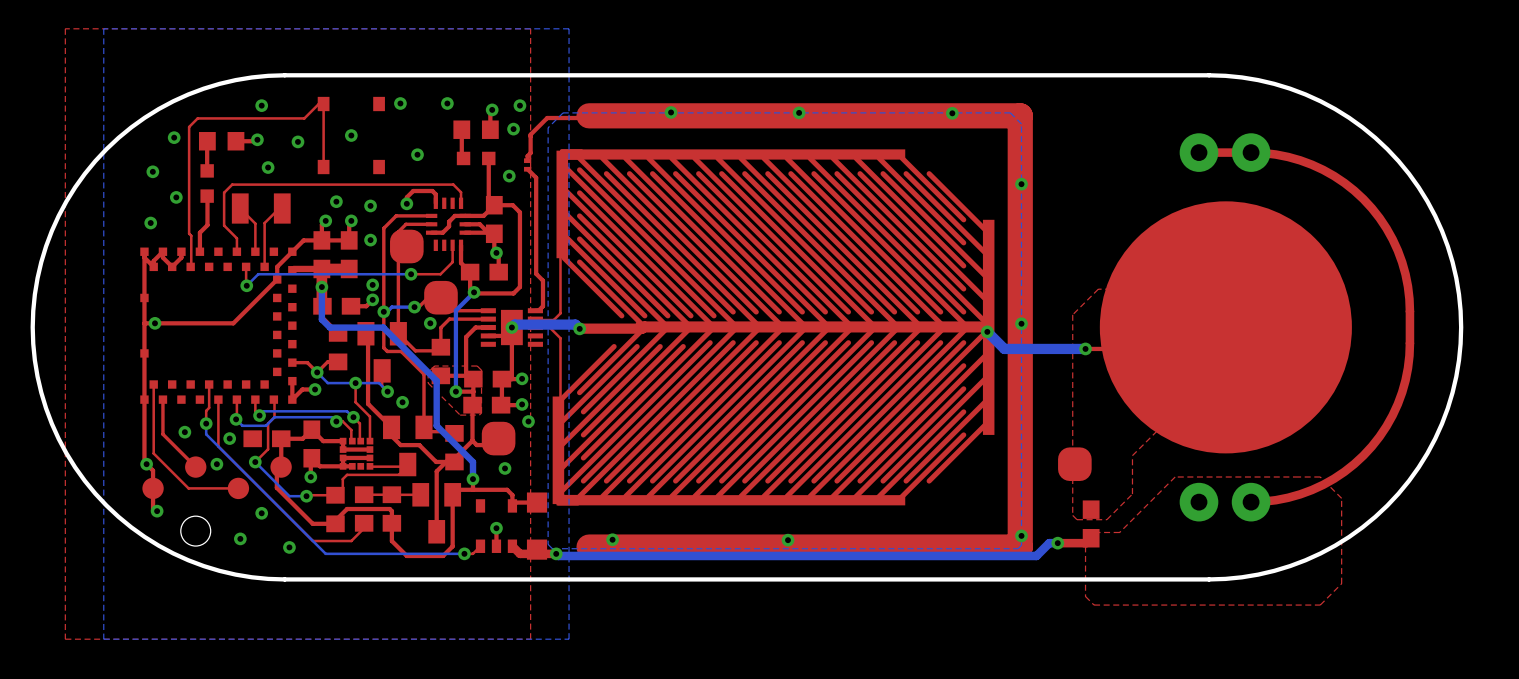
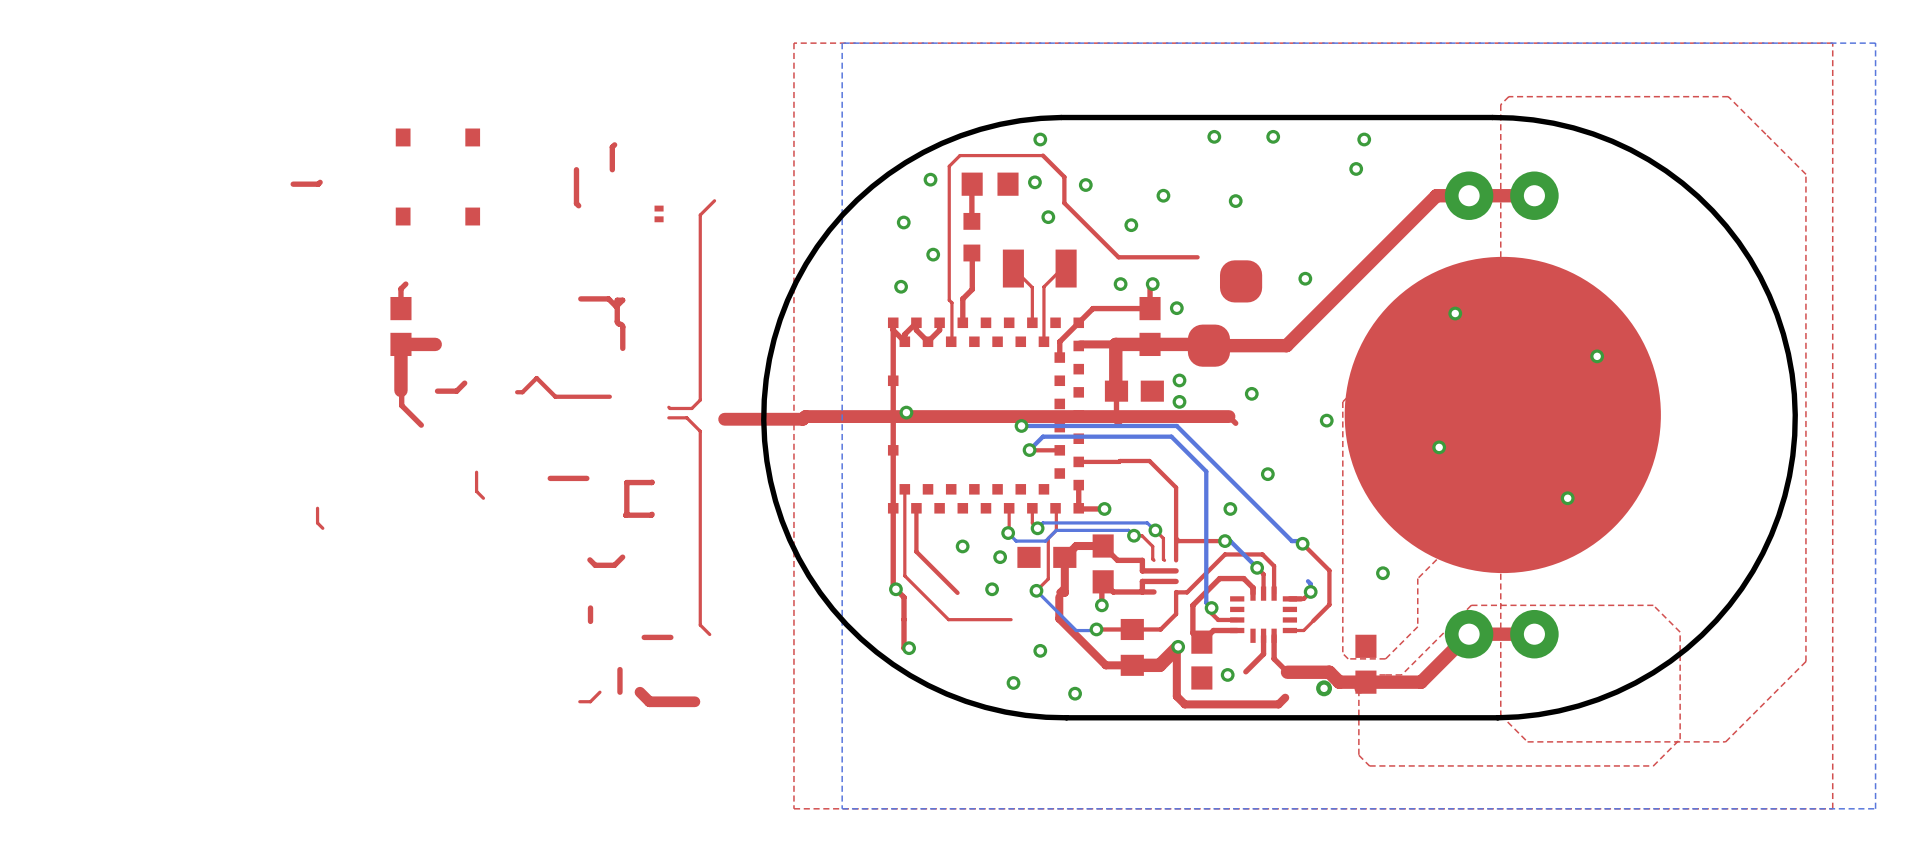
top zone outline: (530, 28) (65, 28) (65, 639) (530, 639) (530, 28) -> none
bottom zone outline: (569, 28) (103, 28) (103, 639) (569, 639) (569, 28) -> none
top zone outline: none -> (1832, 43) (793, 43) (793, 808) (1832, 808) (1832, 43)
bottom zone outline: none -> (1875, 43) (842, 43) (842, 808) (1875, 808) (1875, 43)
top zone outline: none -> (1728, 96) (1805, 174) (1805, 661) (1725, 741) (1527, 741) (1500, 715) (1500, 104) (1508, 96) (1728, 96)
board edge: (1209, 75) (284, 75) (251, 77) (219, 83) (173, 101) (131, 127) (95, 161) (66, 201) (46, 246) (34, 294) (33, 343) (41, 392) (51, 423) (66, 453) (95, 493) (118, 516) (158, 545) (188, 560) (219, 570) (251, 577) (284, 579) (1209, 579) (1241, 577) (1274, 570) (1305, 560) (1349, 536) (1387, 505) (1418, 467) (1441, 423) (1456, 376) (1460, 343) (1459, 294) (1447, 246) (1427, 201) (1398, 161) (1375, 137) (1335, 109) (1290, 88) (1241, 77) (1209, 75) -> (1492, 117) (1533, 119) (1573, 127) (1612, 141) (1666, 170) (1712, 210) (1738, 242) (1760, 277) (1783, 334) (1792, 374) (1794, 435) (1789, 476) (1778, 515) (1762, 553) (1741, 588) (1701, 635) (1670, 661) (1635, 682) (1598, 699) (1558, 710) (1518, 716) (1046, 717) (985, 707) (946, 694) (910, 675) (860, 638) (820, 592) (798, 558) (775, 501) (764, 440) (766, 379) (780, 319) (806, 263) (842, 214) (888, 173) (923, 152) (960, 135) (1000, 124) (1040, 118) (1492, 117)
via: (400, 103) -> none
via: (447, 103) -> none
via: none -> (1214, 136)
via: none -> (1273, 136)
top track: (321, 104) (323, 106) (323, 167) -> none
top track: (323, 104) (318, 104) (304, 118) (197, 118) (189, 126) (190, 266) -> none
via: (261, 105) -> none
via: (519, 105) -> none
via: none -> (1040, 139)
via: none -> (1364, 139)
via: (492, 109) -> none
via: (671, 112) -> none
via: (799, 112) -> none
bottom zone outline: (1010, 112) (1021, 123) (1021, 545) (1018, 548) (552, 548) (548, 544) (548, 127) (563, 112) (1010, 112) -> none
via: (952, 113) -> none
top track: (612, 118) (547, 118) (530, 134) (530, 153) (527, 156) (527, 160) -> none
part: (476, 129) -> none
via: (513, 129) -> none
via: none -> (1356, 168)
via: (351, 135) -> none
via: (174, 137) -> none
via: none -> (930, 179)
via: (257, 139) -> none
via: none -> (1034, 182)
top track: (207, 141) (207, 170) -> none
part: (221, 141) -> none
via: (297, 141) -> none
top track: none -> (971, 184) (971, 221)
part: none -> (990, 184)
via: none -> (1085, 185)
via: none -> (1163, 195)
top track: none -> (1534, 195) (1436, 195) (1286, 345) (1115, 344)
top track: (1198, 152) (1275, 154) (1300, 160) (1334, 176) (1354, 190) (1379, 218) (1397, 250) (1407, 286) (1409, 311) (1407, 368) (1397, 404) (1379, 436) (1354, 464) (1323, 484) (1288, 497) (1251, 502) -> none
via: (417, 154) -> none
via: none -> (1235, 201)
part: (476, 158) -> none
top track: (488, 158) (488, 197) (496, 205) -> none
via: (268, 167) -> none
via: none -> (1048, 217)
top track: (527, 169) (536, 177) (536, 273) (542, 280) (542, 306) (538, 310) (535, 310) -> none
via: (152, 171) -> none
via: none -> (903, 222)
via: none -> (1131, 225)
via: (509, 176) -> none
part: (207, 183) -> none
part: none -> (971, 237)
via: (1021, 184) -> none
top track: (207, 196) (207, 225) (199, 232) (199, 251) -> none
top track: none -> (971, 253) (972, 289) (962, 298) (962, 322)
via: (176, 197) -> none
via: none -> (933, 254)
top track: none -> (1197, 257) (1118, 257) (1064, 203) (1064, 176) (1042, 155) (959, 155) (949, 166) (951, 341)
via: (336, 201) -> none
via: (406, 203) -> none
top track: (435, 203) (435, 194) (432, 191) (413, 191) (406, 197) (406, 203) -> none
top track: (461, 203) (461, 192) (453, 184) (232, 184) (224, 192) (224, 225) (236, 238) (236, 251) -> none
via: (370, 205) -> none
top track: (240, 208) (255, 223) (255, 251) -> none
part: (261, 208) -> none
top track: (282, 208) (279, 208) (264, 223) (264, 266) -> none
top track: none -> (1013, 268) (1032, 287) (1032, 322)
part: none -> (1039, 268)
top track: none -> (1066, 268) (1062, 268) (1043, 286) (1043, 341)
top track: (431, 215) (396, 215) (383, 228) (383, 347) (387, 351) (401, 351) (423, 374) (423, 427) (428, 431) (452, 431) (454, 433) -> none
via: none -> (1305, 278)
part: none -> (1241, 281)
part: (494, 219) -> none
via: (325, 220) -> none
top track: (351, 220) (349, 223) (349, 240) (303, 240) (277, 266) (277, 279) (233, 323) (144, 323) -> none
via: (351, 220) -> none
via: none -> (1120, 284)
top track: none -> (1152, 284) (1150, 286) (1150, 308) (1092, 308) (1059, 341) (1059, 357)
via: none -> (1152, 284)
via: (150, 223) -> none
via: none -> (901, 286)
top track: (431, 224) (406, 224) (398, 231) (398, 333) (415, 350) (437, 350) (440, 347) (440, 327) (449, 319) (488, 319) -> none
part: (448, 224) -> none
top track: (465, 224) (479, 224) (493, 238) -> none
top track: (431, 232) (442, 232) (454, 215) (483, 215) (494, 205) (512, 205) (519, 212) (519, 287) (513, 293) (475, 293) (470, 288) (470, 272) (461, 263) (461, 245) -> none
via: (370, 240) -> none
via: none -> (1176, 308)
via: none -> (1455, 313)
top track: (452, 245) (452, 262) (440, 274) (411, 274) -> none
part: (406, 246) -> none
top track: (144, 251) (144, 462) (153, 470) (153, 511) (157, 511) -> none
top track: (181, 251) (181, 257) (172, 266) (162, 257) (162, 251) (153, 260) (153, 266) (144, 257) -> none
top track: none -> (893, 322) (893, 586) (904, 597) (904, 648) (909, 648)
top track: none -> (939, 322) (939, 330) (928, 341) (916, 330) (916, 322) (904, 334) (904, 341) (893, 330)
via: (496, 252) -> none
part: (349, 254) -> none
part: none -> (1150, 326)
top track: (246, 266) (246, 285) -> none
top track: (321, 268) (292, 270) -> none
top track: none -> (1115, 344) (1116, 421) (1120, 425)
top track: none -> (1115, 344) (1078, 345)
part: none -> (1208, 345)
part: (484, 272) -> none
bottom track: (411, 274) (258, 274) (246, 285) -> none
via: (411, 274) -> none
via: none -> (1597, 356)
via: (372, 284) -> none
via: (246, 285) -> none
bottom track: (321, 287) (321, 319) (329, 327) (383, 327) (436, 380) (436, 425) (472, 462) (472, 479) -> none
via: (321, 287) -> none
bottom track: (474, 292) (455, 310) (455, 391) -> none
via: (474, 292) -> none
part: (440, 297) -> none
via: none -> (1179, 380)
via: (372, 299) -> none
part: (336, 306) -> none
part: none -> (1134, 391)
bottom track: (414, 307) (391, 307) (383, 311) -> none
via: (414, 307) -> none
via: none -> (1251, 393)
via: (383, 311) -> none
via: none -> (1179, 401)
via: (154, 323) -> none
via: (430, 323) -> none
via: none -> (906, 412)
via: (1021, 323) -> none
part: (218, 325) -> none
part: none -> (985, 415)
top track: (488, 327) (475, 327) (466, 337) (466, 371) (473, 379) (472, 440) (453, 459) (448, 459) (436, 471) (436, 531) -> none
bottom track: (511, 327) (514, 324) (575, 324) (579, 328) -> none
part: (511, 327) -> none
via: (511, 327) -> none
part: (773, 327) -> none
part position: (1225, 327) -> (1502, 414)
via: (579, 328) -> none
via: none -> (1326, 420)
part: (804, 331) -> none
bottom track: (987, 331) (1004, 348) (1085, 348) -> none
via: (987, 331) -> none
top track: (365, 333) (368, 335) (368, 403) (391, 427) (391, 435) (400, 445) (419, 445) (436, 461) (454, 461) (452, 459) -> none
bottom track: none -> (1021, 425) (1176, 425) (1291, 541) (1299, 541) (1302, 543)
via: none -> (1021, 425)
top track: (488, 335) (503, 335) (511, 327) (511, 379) -> none
part: (338, 347) -> none
via: (1085, 348) -> none
via: none -> (1439, 447)
part: (382, 352) -> none
bottom track: none -> (1029, 450) (1042, 436) (1171, 436) (1206, 471) (1206, 602) (1211, 608)
via: none -> (1029, 450)
top track: none -> (1059, 450) (1029, 450)
top track: (338, 361) (327, 361) (317, 372) (307, 362) (292, 362) -> none
part: (440, 361) -> none
top track: none -> (1078, 461) (1149, 460) (1176, 487) (1176, 560)
top zone outline: (477, 366) (481, 370) (481, 412) (479, 415) (460, 415) (428, 383) (428, 372) (434, 366) (477, 366) -> none
bottom track: (317, 372) (327, 383) (379, 383) (387, 391) -> none
via: (317, 372) -> none
via: none -> (1267, 474)
via: (522, 378) -> none
part: (487, 379) -> none
top track: (292, 381) (292, 399) (302, 389) (315, 389) -> none
top track: none -> (1078, 485) (1079, 508) (1104, 508)
top track: (355, 383) (355, 402) (369, 416) (369, 441) -> none
via: (355, 383) -> none
top track: (153, 384) (153, 453) (188, 488) (238, 488) -> none
top track: (209, 384) (209, 407) (206, 410) (206, 423) -> none
top track: none -> (904, 489) (904, 575) (948, 619) (1011, 619)
via: (315, 389) -> none
via: (387, 391) -> none
via: (455, 391) -> none
top track: (473, 391) (455, 391) -> none
via: none -> (1567, 498)
top track: (162, 399) (162, 434) (195, 467) -> none
top track: (218, 399) (218, 446) (312, 541) (351, 541) (364, 528) (364, 523) -> none
top track: (236, 399) (236, 419) -> none
top track: (273, 399) (274, 417) (268, 423) (268, 449) (255, 462) -> none
top track: none -> (916, 508) (916, 551) (957, 592)
top track: none -> (1009, 508) (1008, 533)
top track: none -> (1032, 508) (1032, 523) (1037, 528)
top track: none -> (1055, 508) (1056, 530) (1048, 538) (1048, 578) (1036, 590)
via: none -> (1104, 508)
via: none -> (1230, 508)
via: (402, 402) -> none
via: (522, 404) -> none
part: (486, 405) -> none
bottom track: (259, 415) (263, 411) (347, 411) (353, 417) -> none
via: (259, 415) -> none
bottom track: none -> (1037, 528) (1042, 522) (1147, 522) (1155, 530)
via: none -> (1037, 528)
top track: (353, 417) (359, 423) (360, 441) -> none
via: (353, 417) -> none
top track: none -> (1155, 530) (1163, 538) (1164, 560)
via: none -> (1155, 530)
bottom track: (236, 419) (242, 425) (265, 425) (274, 417) (332, 417) (336, 421) -> none
via: (236, 419) -> none
bottom track: none -> (1008, 533) (1016, 541) (1045, 541) (1056, 530) (1128, 530) (1133, 535)
via: none -> (1008, 533)
top track: (336, 421) (342, 421) (351, 430) (352, 441) -> none
via: (336, 421) -> none
via: (528, 421) -> none
top track: none -> (1133, 535) (1142, 535) (1152, 546) (1153, 560)
via: none -> (1133, 535)
bottom track: (206, 423) (206, 434) (325, 553) (464, 553) -> none
via: (206, 423) -> none
top track: none -> (1176, 538) (1178, 541) (1225, 541)
bottom track: none -> (1225, 541) (1230, 541) (1257, 567)
via: none -> (1225, 541)
top track: none -> (1302, 543) (1329, 570) (1329, 604) (1303, 630) (1289, 630)
via: none -> (1302, 543)
via: none -> (962, 546)
via: (184, 432) -> none
via: (229, 438) -> none
part: (266, 438) -> none
part: (498, 438) -> none
via: none -> (1000, 557)
part: none -> (1046, 557)
part: (311, 443) -> none
part: none -> (1103, 563)
part: (407, 445) -> none
part: (454, 447) -> none
top track: none -> (1257, 567) (1263, 574) (1263, 593)
via: none -> (1257, 567)
top track: (369, 449) (343, 449) (343, 441) (323, 441) (311, 429) (302, 438) (281, 438) (281, 466) -> none
top track: none -> (1176, 570) (1142, 570) (1142, 560) (1117, 560) (1103, 546) (1076, 546) (1064, 557) (1064, 592)
via: none -> (1382, 573)
part: (356, 453) -> none
top track: (369, 457) (343, 457) (343, 466) -> none
top track: none -> (1176, 581) (1142, 581) (1142, 591)
bottom track: none -> (1308, 581) (1310, 583) (1310, 591)
bottom track: (255, 462) (289, 496) (306, 496) -> none
via: (255, 462) -> none
via: (146, 464) -> none
via: (216, 464) -> none
via: none -> (895, 589)
via: none -> (992, 589)
part: (1074, 464) -> none
bottom track: none -> (1036, 590) (1076, 630) (1096, 629)
via: none -> (1036, 590)
top track: (352, 466) (319, 466) (311, 458) (310, 477) -> none
top track: (369, 466) (400, 466) (402, 464) (409, 464) (398, 474) (347, 474) (342, 479) (342, 487) (335, 495) (306, 496) -> none
top track: none -> (1153, 591) (1113, 591) (1103, 581) (1101, 605)
top track: none -> (1310, 591) (1303, 598) (1289, 598)
via: none -> (1310, 591)
top track: (281, 467) (281, 462) (276, 466) (276, 487) (312, 523) (335, 523) (335, 520) (347, 509) (389, 509) (391, 511) (391, 541) (406, 555) (443, 555) (452, 546) (452, 494) (458, 489) (507, 489) (512, 495) (512, 505) -> none
top track: none -> (1064, 592) (1064, 586) (1059, 591) (1059, 618) (1105, 665) (1132, 665)
top track: none -> (1253, 593) (1253, 587) (1243, 578) (1219, 578) (1192, 605) (1192, 633) (1201, 642) (1213, 630) (1237, 630)
top track: none -> (1274, 593) (1274, 566) (1262, 554) (1225, 554) (1187, 592) (1176, 591) (1176, 614) (1160, 629) (1096, 629)
via: (505, 468) -> none
via: (310, 477) -> none
via: none -> (1101, 605)
via: (472, 479) -> none
top track: none -> (1211, 608) (1211, 613) (1218, 619) (1237, 619)
via: none -> (1211, 608)
part: none -> (1263, 614)
via: (306, 496) -> none
via: none -> (1096, 629)
top track: none -> (1534, 634) (1469, 634) (1421, 682) (1339, 682) (1329, 672) (1287, 672) (1274, 658) (1274, 635)
part: (217, 501) -> none
top track: none -> (1263, 635) (1263, 654) (1245, 671)
part: (335, 509) -> none
part: (364, 509) -> none
part: (391, 509) -> none
part: none -> (1132, 647)
via: none -> (1178, 646)
via: (157, 511) -> none
via: none -> (909, 648)
via: (261, 513) -> none
part: (436, 513) -> none
via: none -> (1040, 650)
part: none -> (1201, 660)
top track: none -> (1132, 665) (1159, 665) (1176, 648) (1176, 696) (1184, 704) (1278, 704) (1285, 697)
part: (496, 526) -> none
part: (537, 526) -> none
via: (496, 528) -> none
via: none -> (1227, 674)
via: (1021, 535) -> none
via: (240, 538) -> none
via: none -> (1013, 682)
via: (612, 539) -> none
via: (788, 540) -> none
bottom track: (1057, 543) (1049, 543) (1036, 555) (558, 555) (556, 553) -> none
top track: (1086, 543) (1057, 543) -> none
via: (289, 547) -> none
via: none -> (1075, 693)
via: (464, 553) -> none
via: (556, 553) -> none

